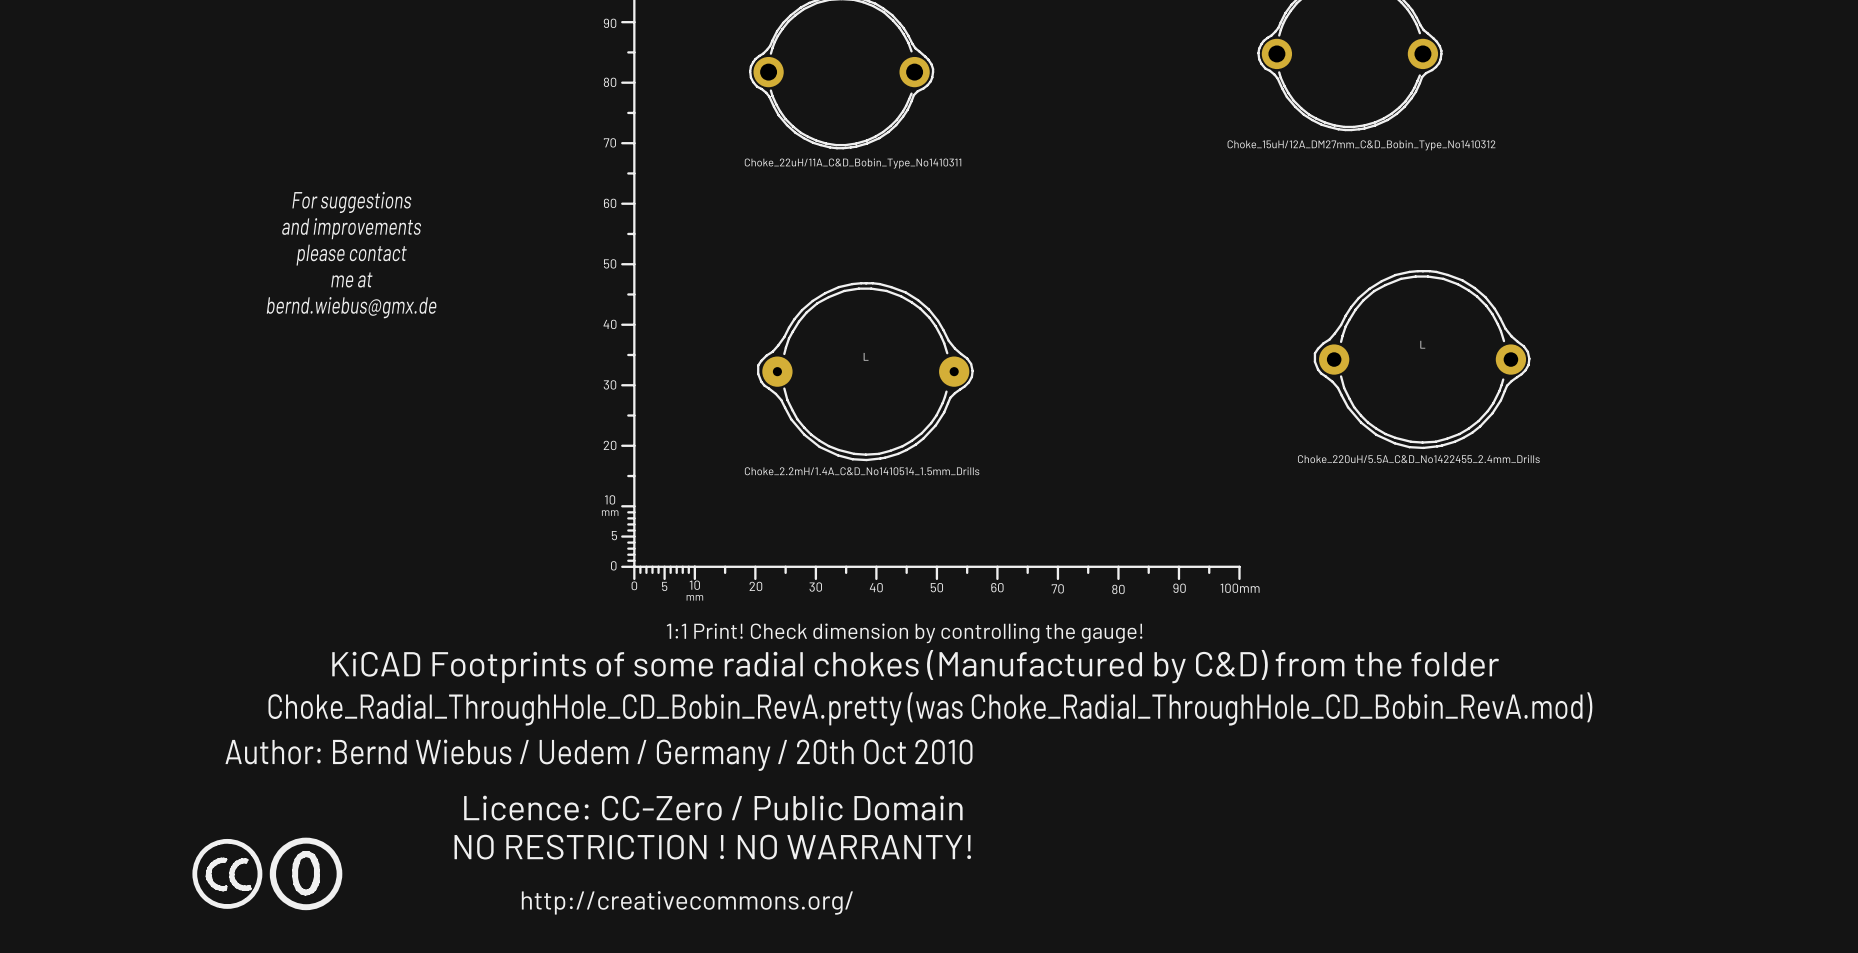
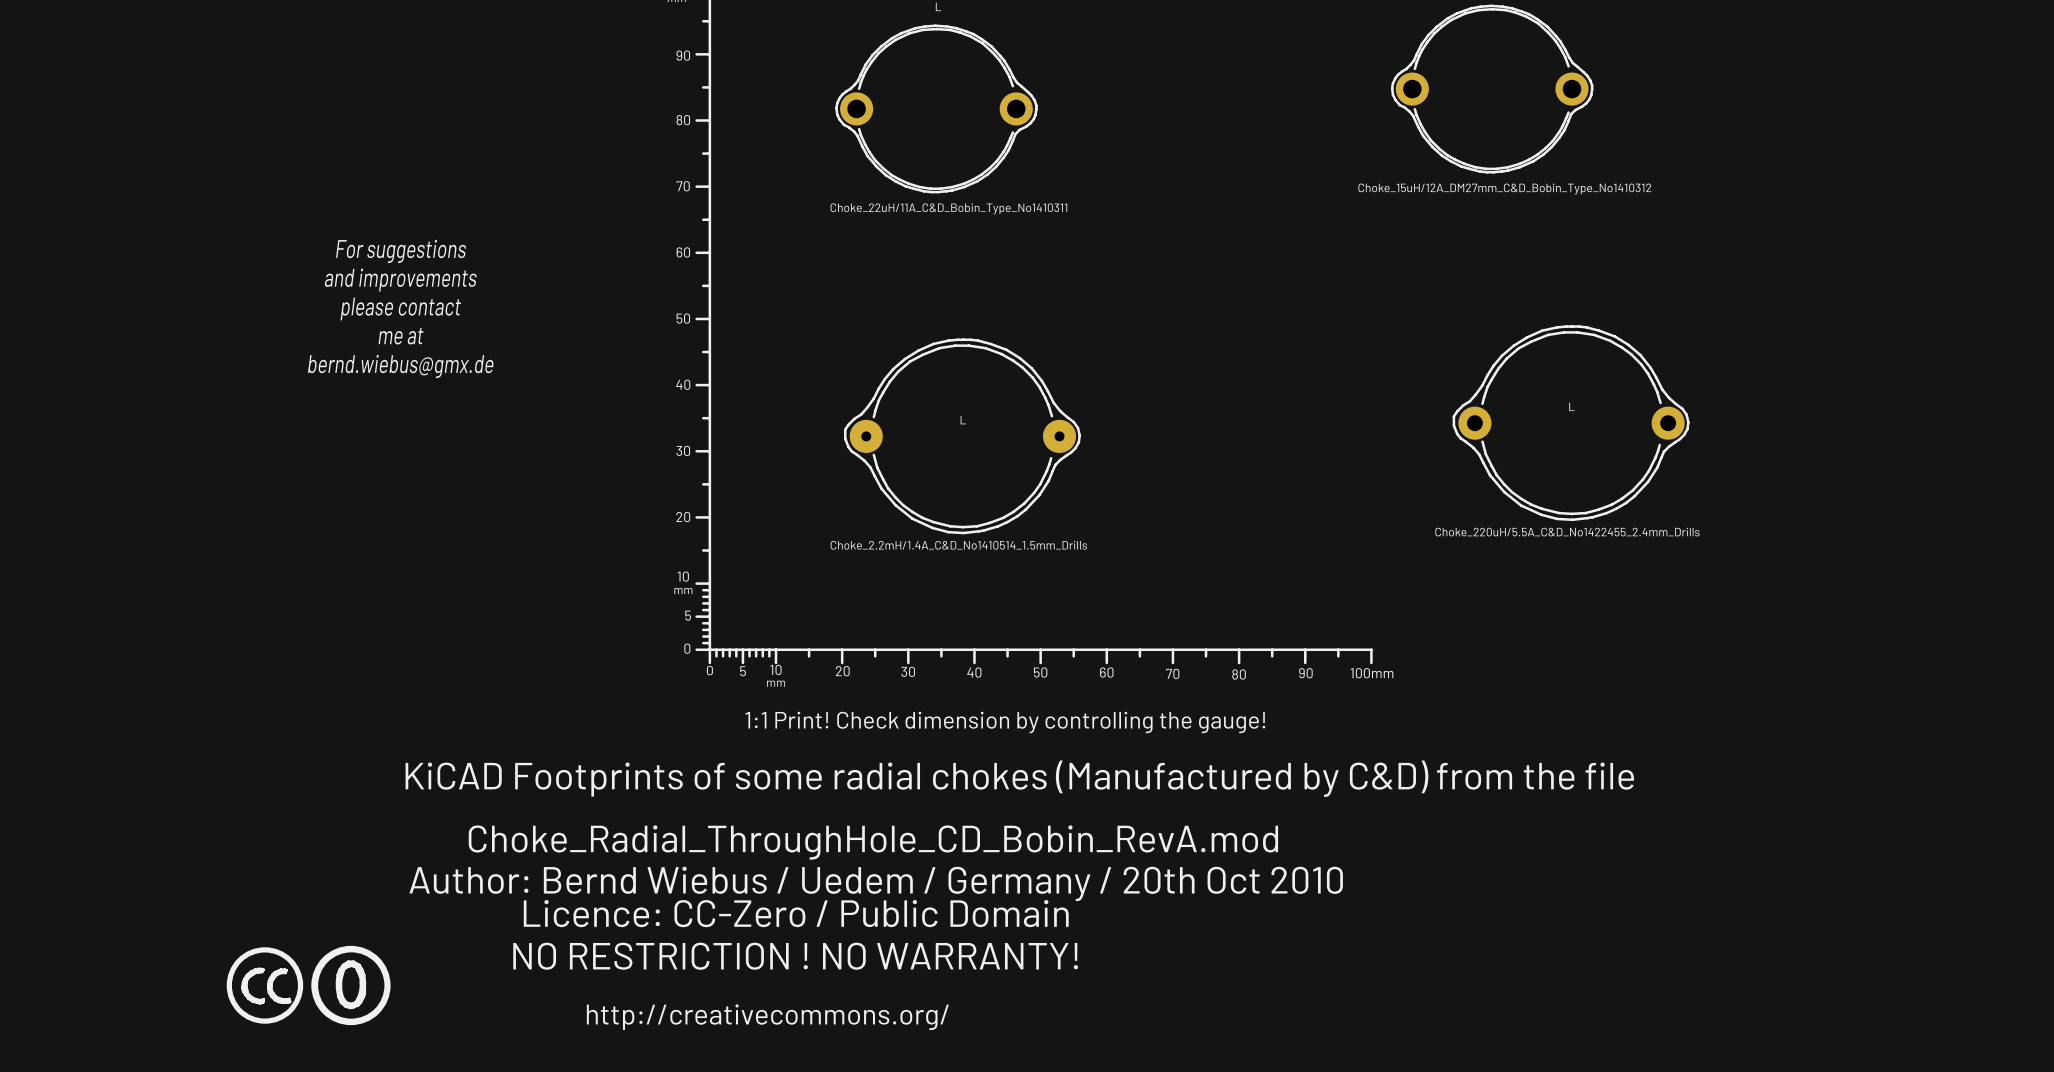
text: KiCAD Footprints of some radial chokes (Manufactured by C&D) from the folder (915, 666) -> KiCAD Footprints of some radial chokes (Manufactured by C&D) from the file (1019, 778)
text: Choke_Radial_ThroughHole_CD_Bobin_RevA.pretty (was Choke_Radial_ThroughHole_CD_Bobin_RevA.mod) (930, 708) -> Choke_Radial_ThroughHole_CD_Bobin_RevA.mod (873, 842)
text: Author: Bernd Wiebus / Uedem / Germany / 20th Oct 2010 (598, 755) -> none
text: none -> Author: Bernd Wiebus / Uedem / Germany / 20th Oct 2010 (876, 883)

